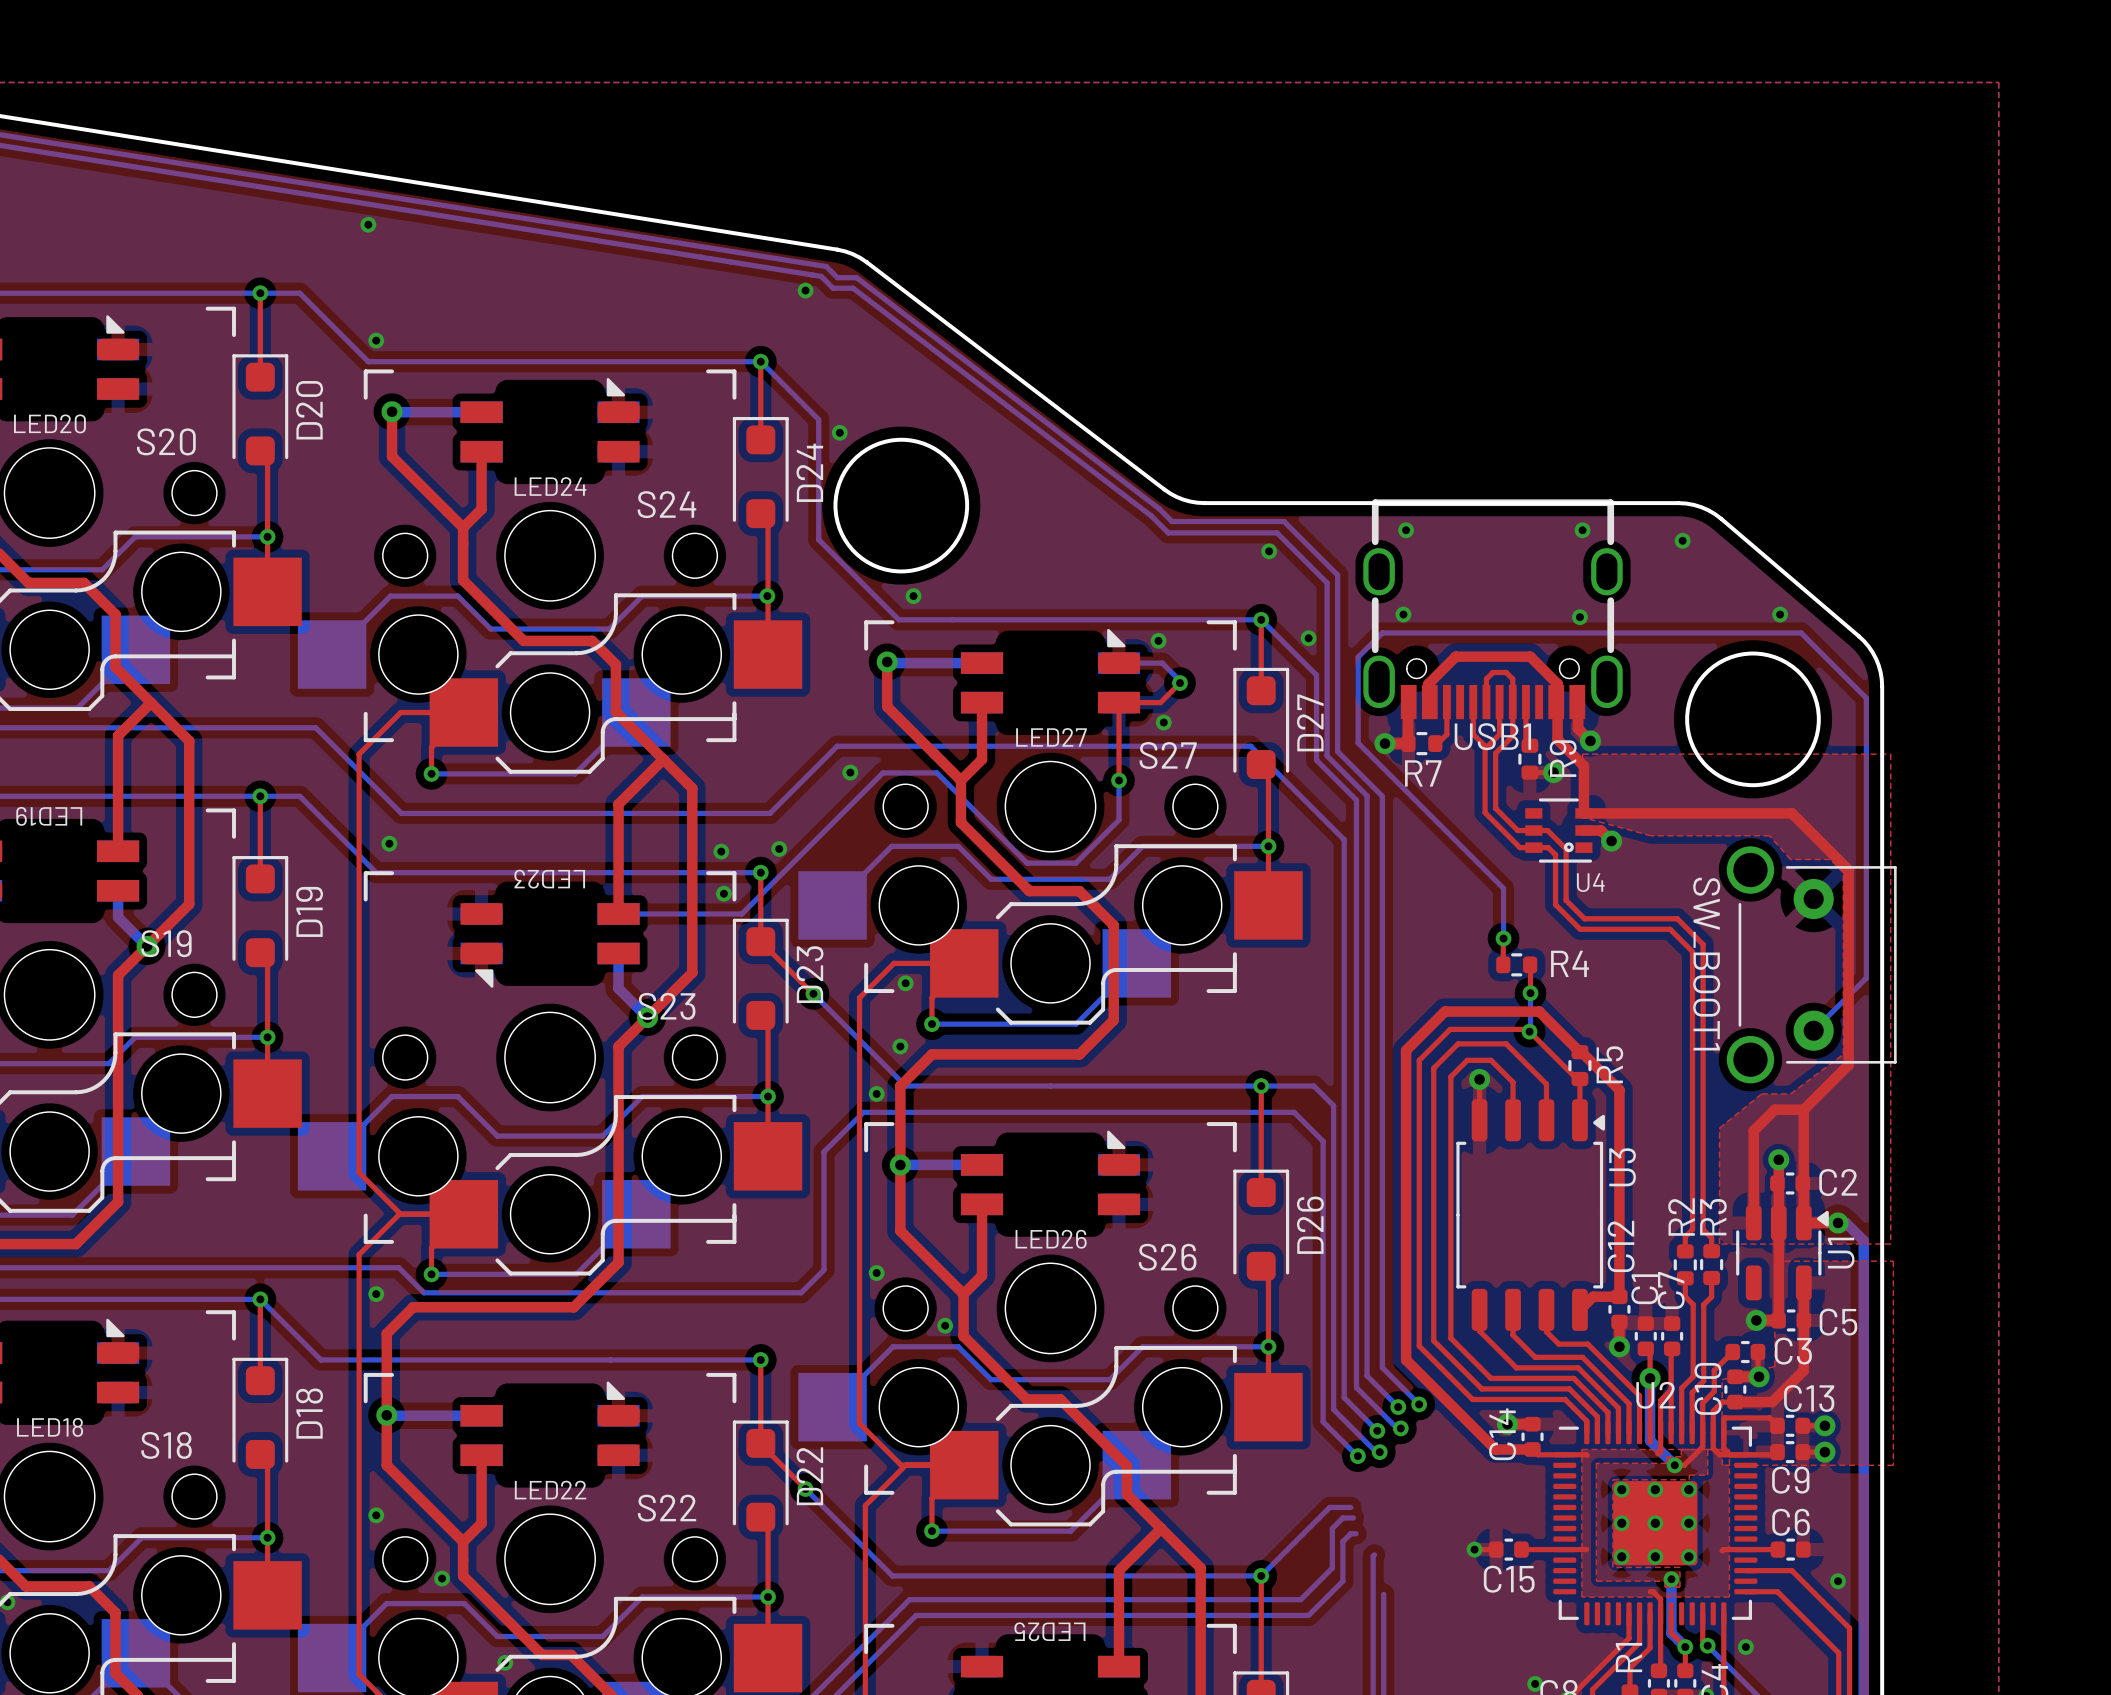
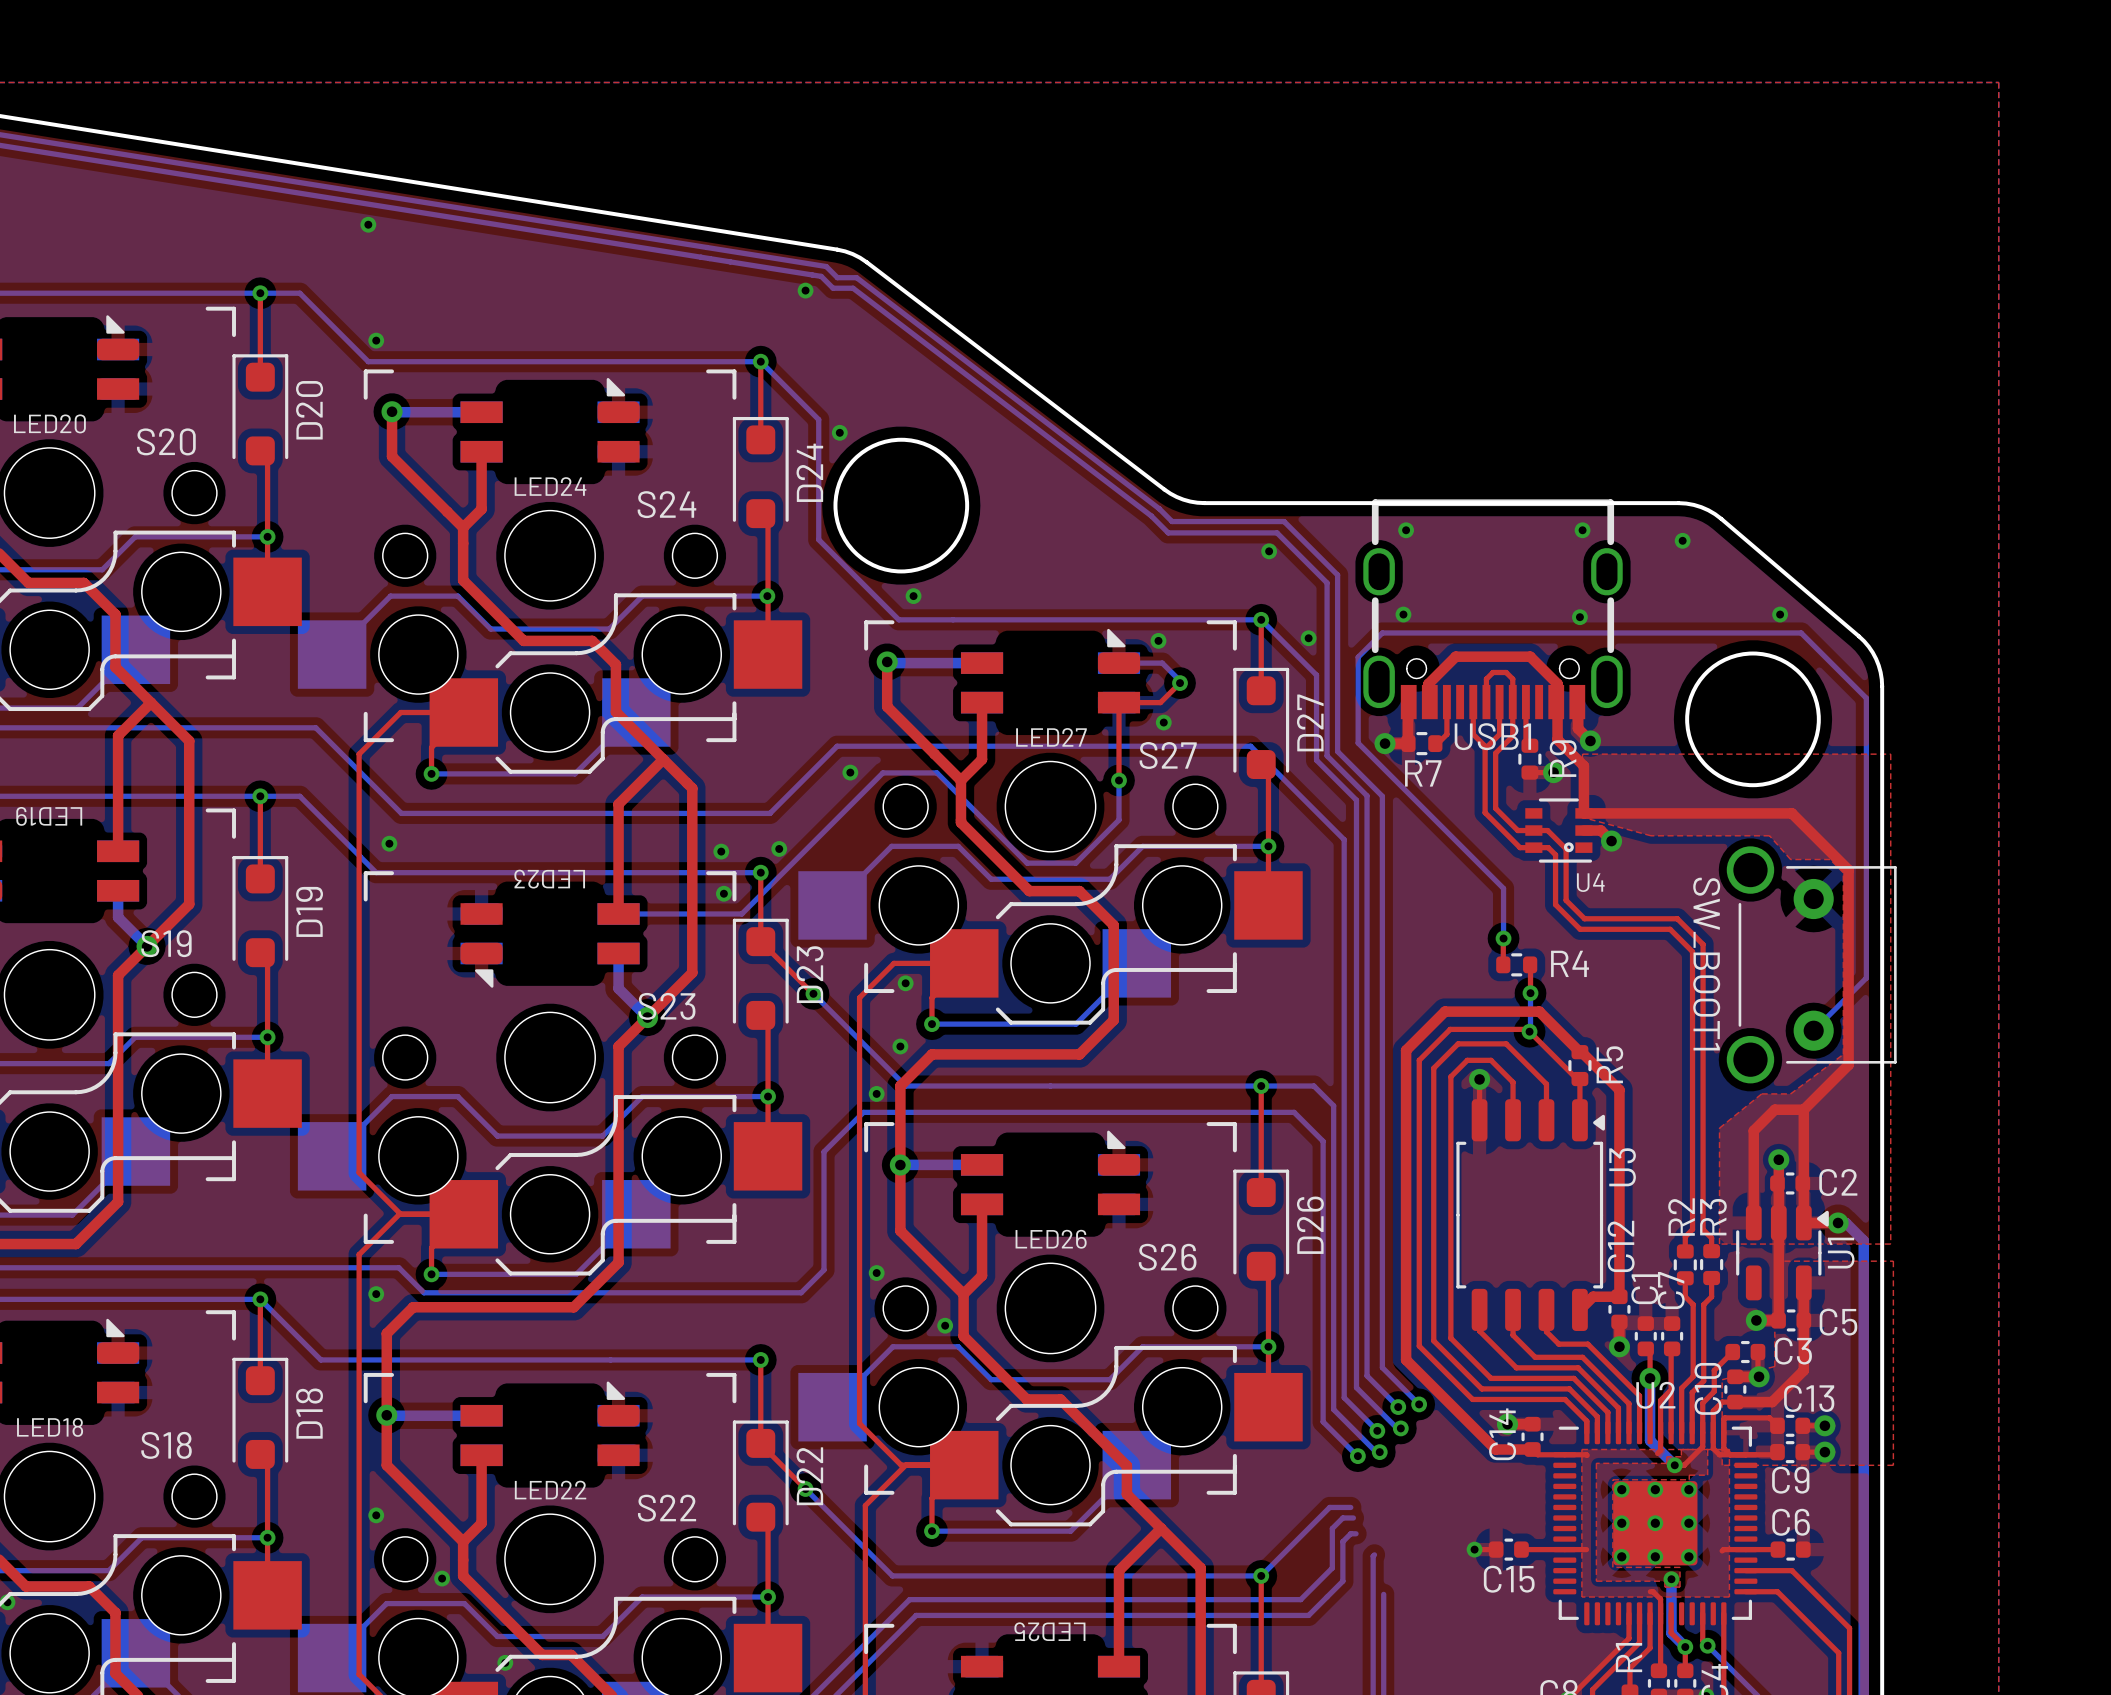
via: (1838, 1581) -> none
via: (1745, 1647) -> none
via: (1535, 1683) -> none

